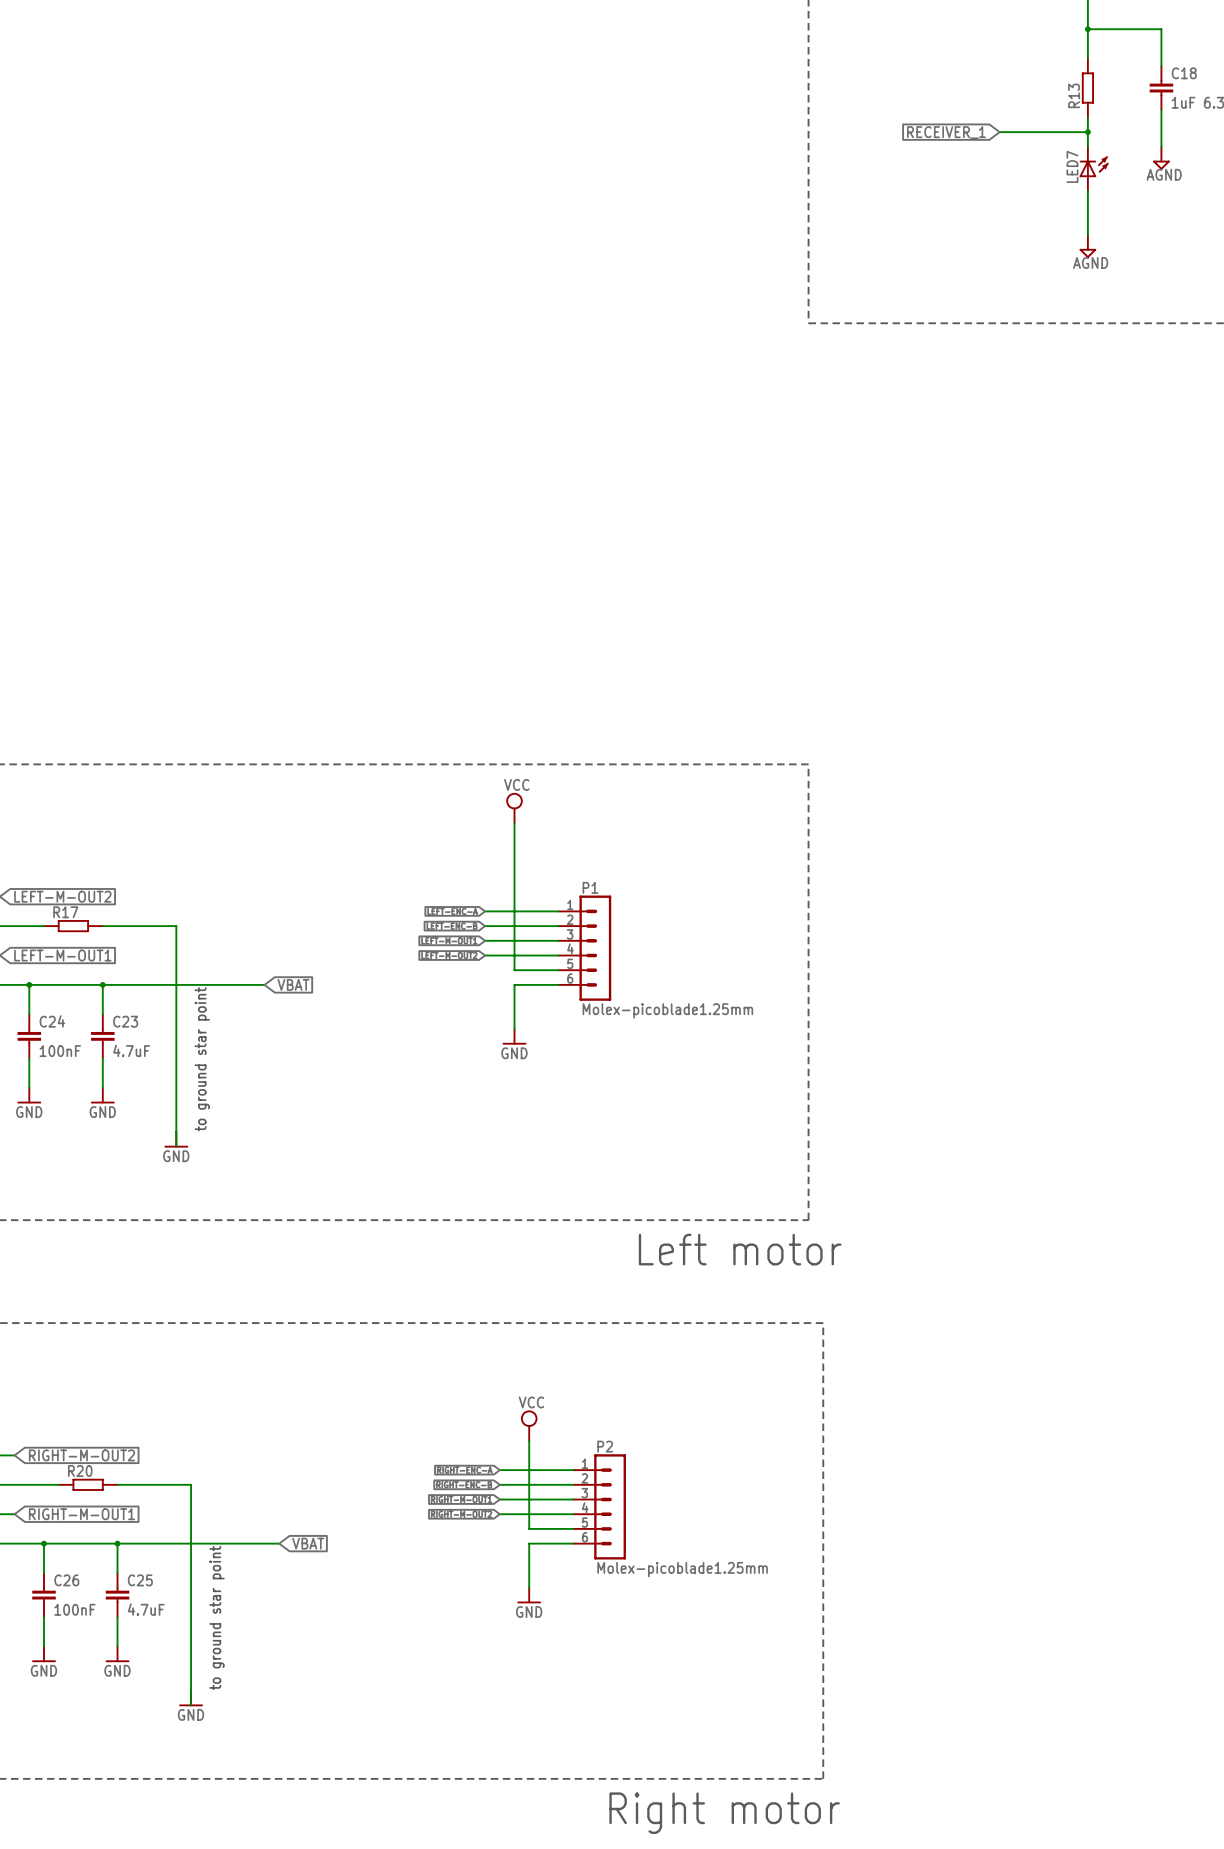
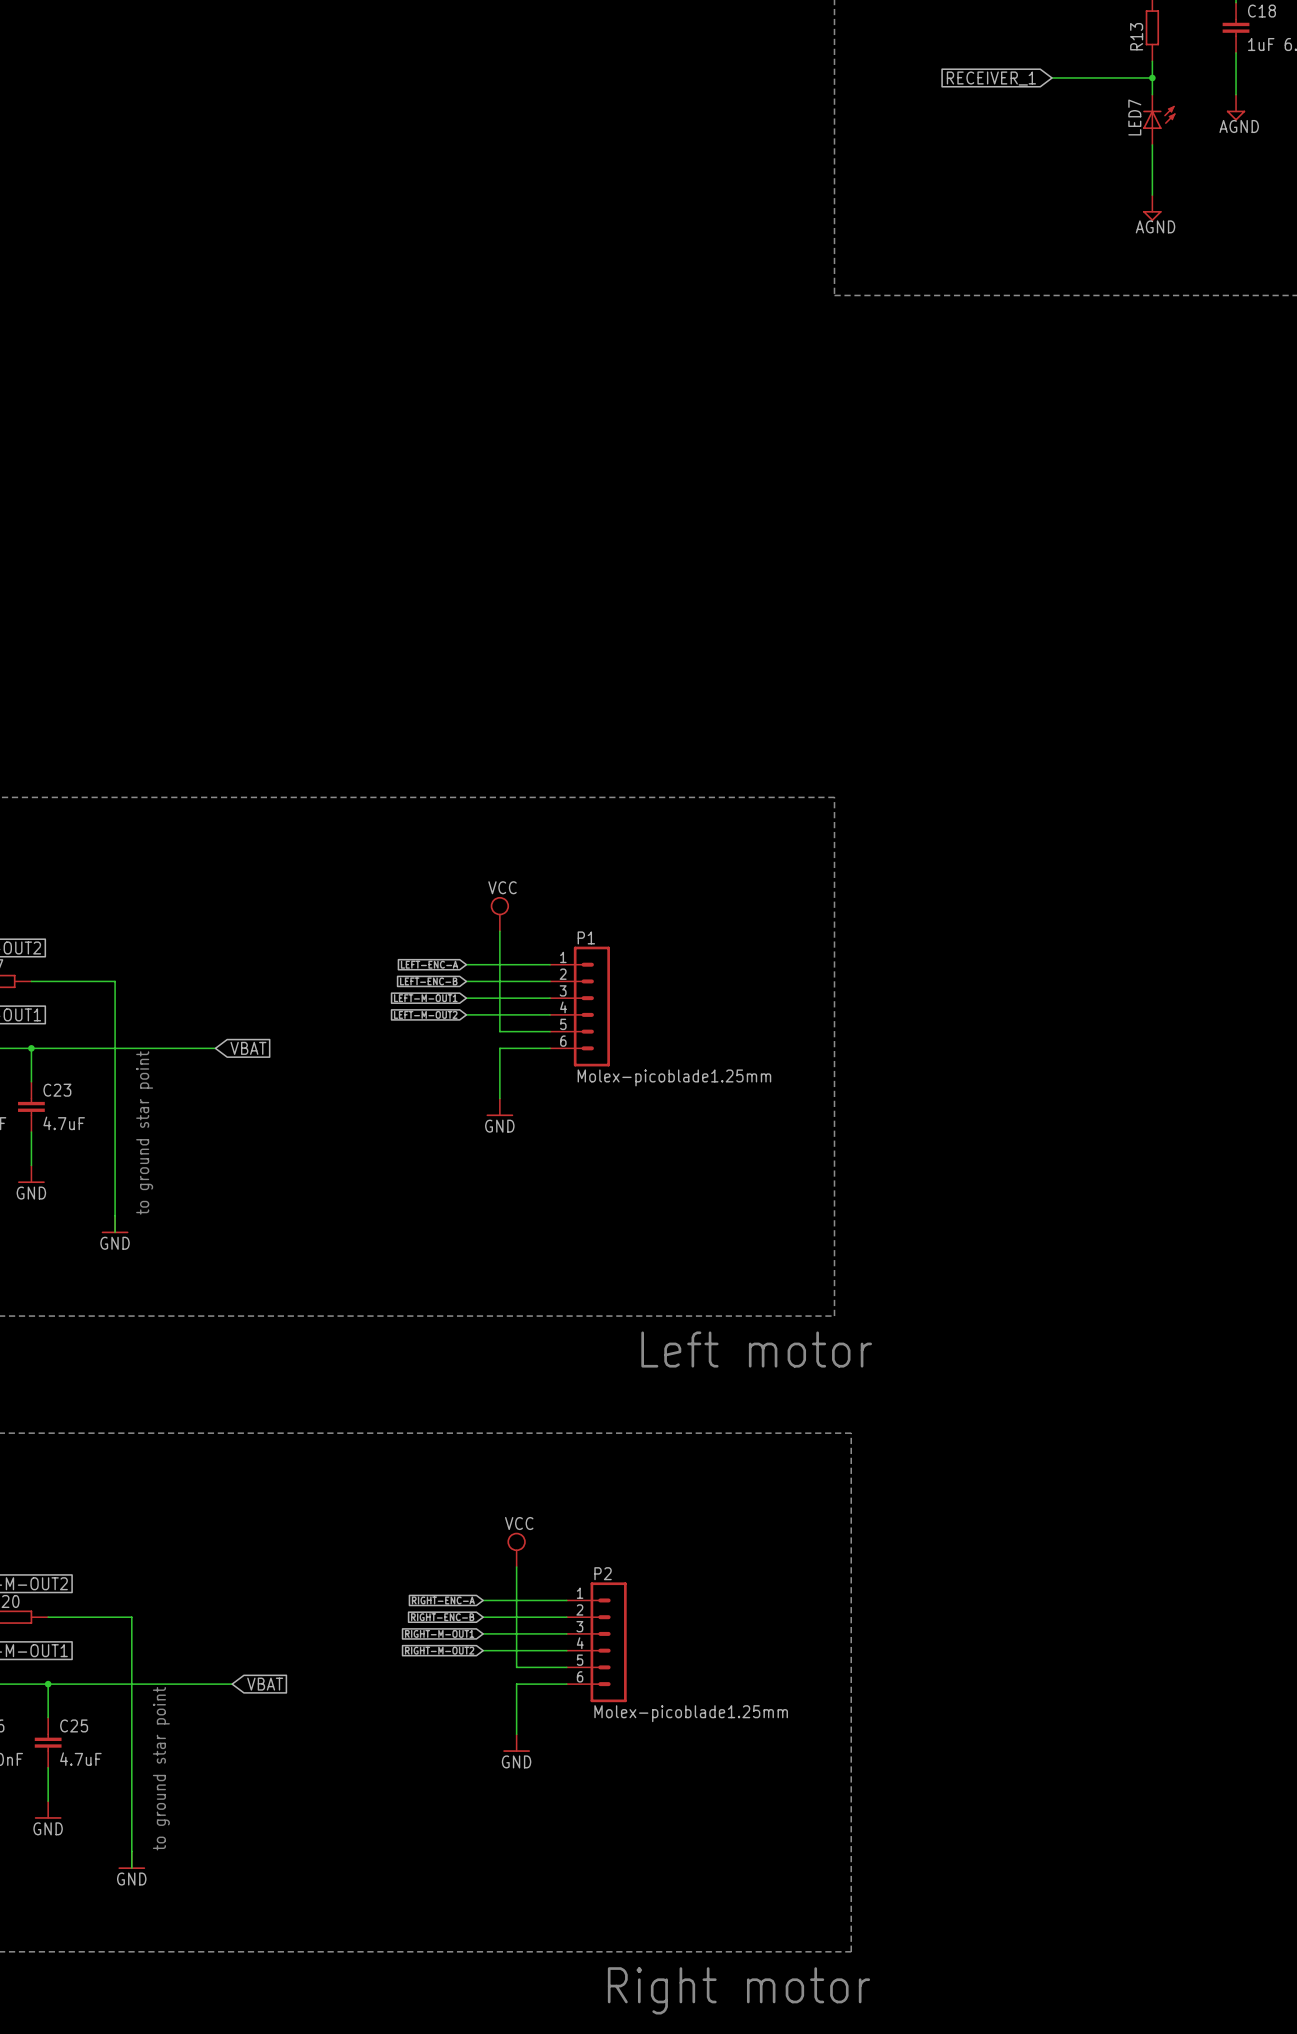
power symbol position: VCC (514, 808) -> VCC (499, 914)
wire: (514, 823) (514, 882) -> none

